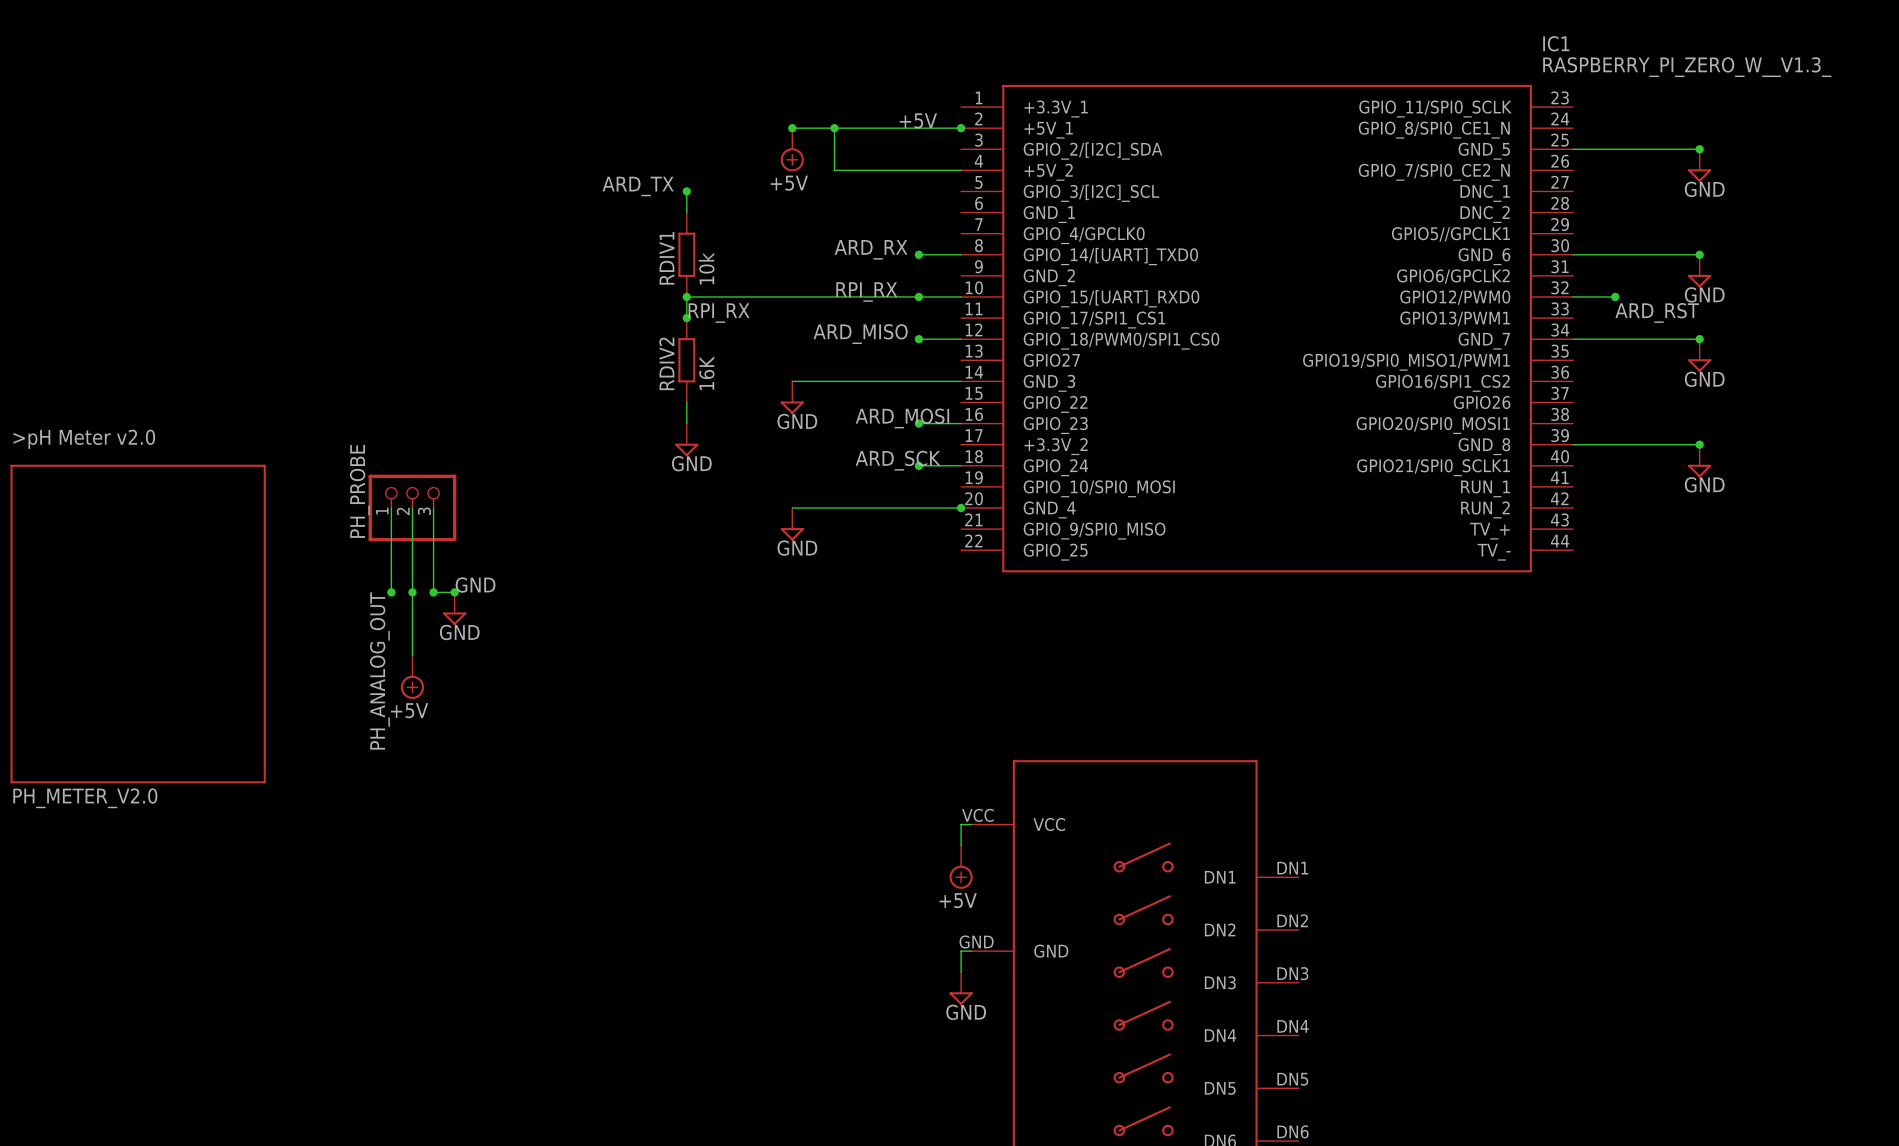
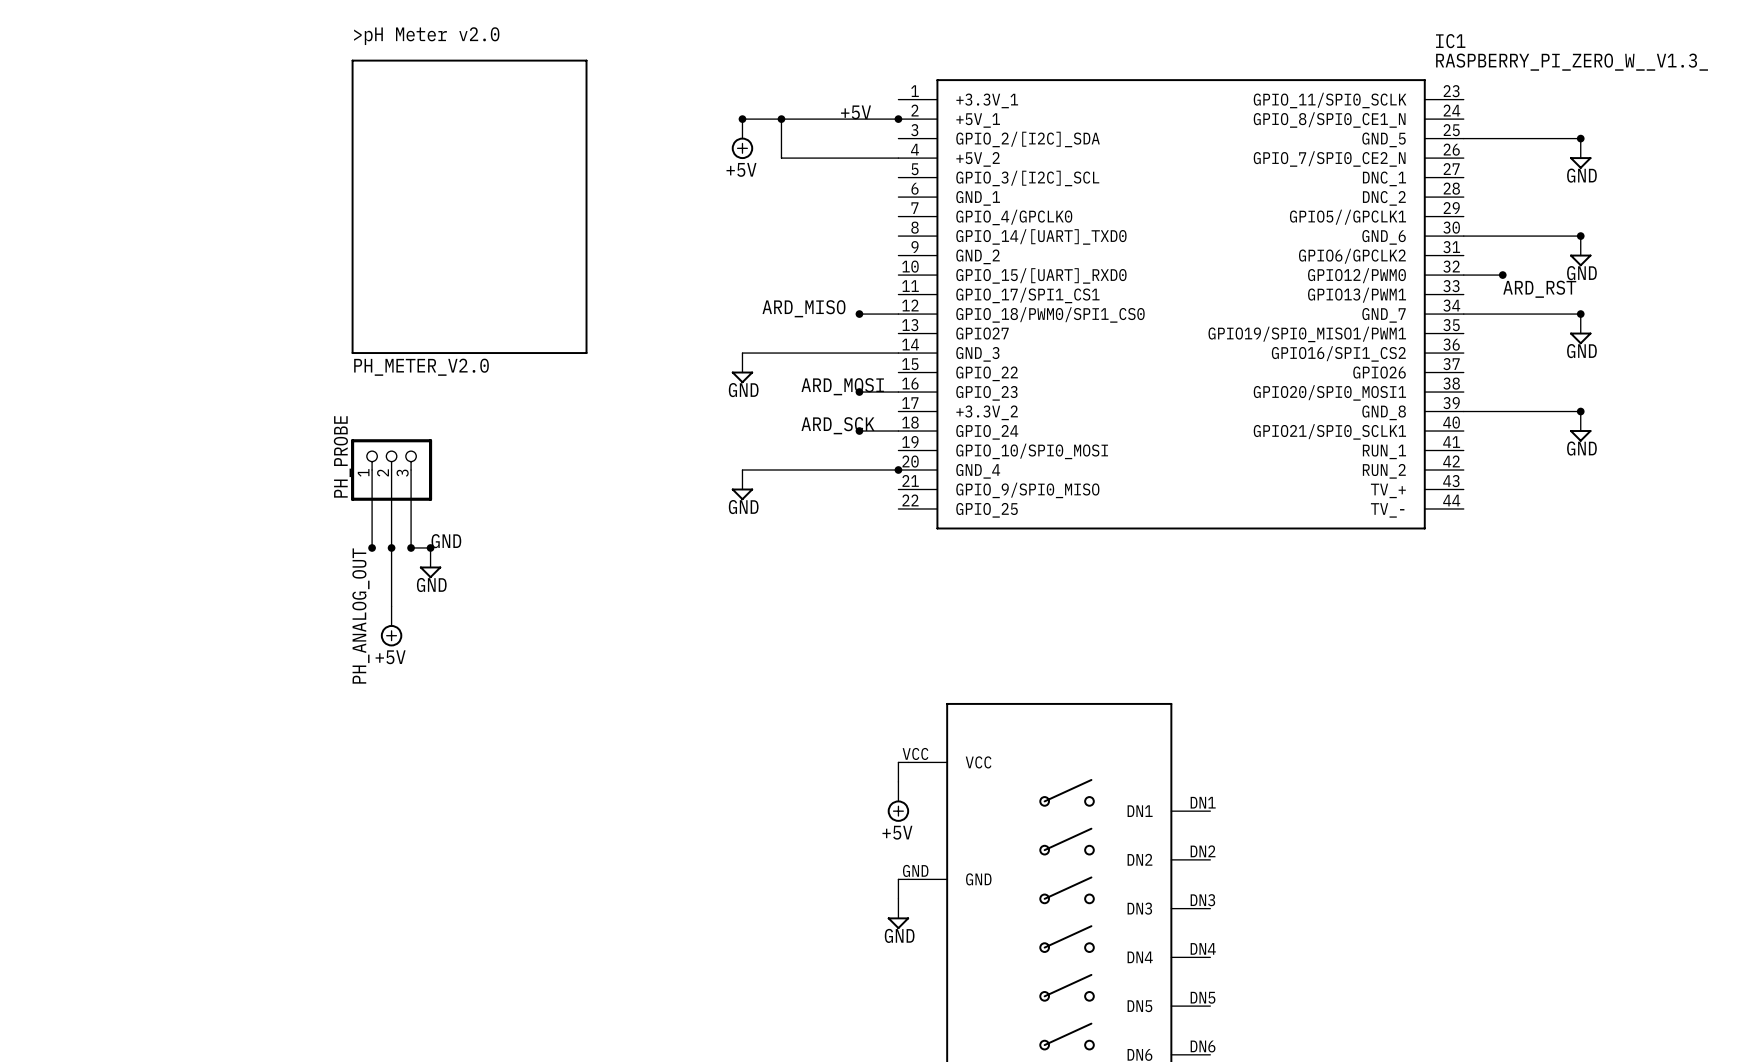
label: ARD_TX (638, 186) -> none
wire: (686, 191) (686, 212) -> none
junction: (686, 191) -> none
part: none -> PH_METER_V2.0 (469, 206)
label: ARD_RX (871, 249) -> none
RDIV1: 10k (686, 254) -> none
wire: (918, 254) (961, 254) -> none
junction: (918, 254) -> none
label: RPI_RX (866, 291) -> none
junction: (686, 296) -> none
junction: (918, 296) -> none
wire: (961, 296) (686, 296) (686, 318) -> none
label: RPI_RX (719, 313) -> none
junction: (686, 318) -> none
RDIV2: 16K (686, 360) -> none
wire: (686, 402) (686, 423) -> none
power symbol: GND (686, 439) -> none
part: PH_METER_V2.0 (138, 624) -> none

